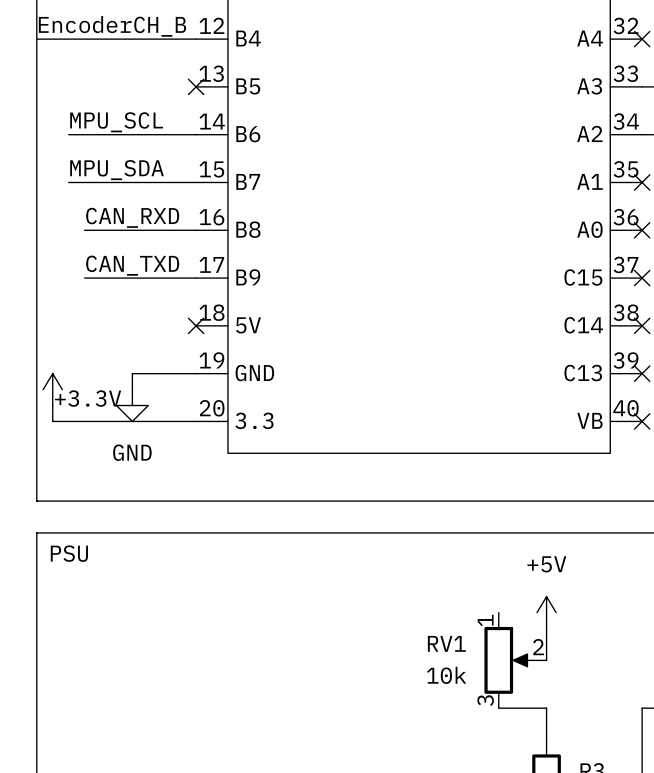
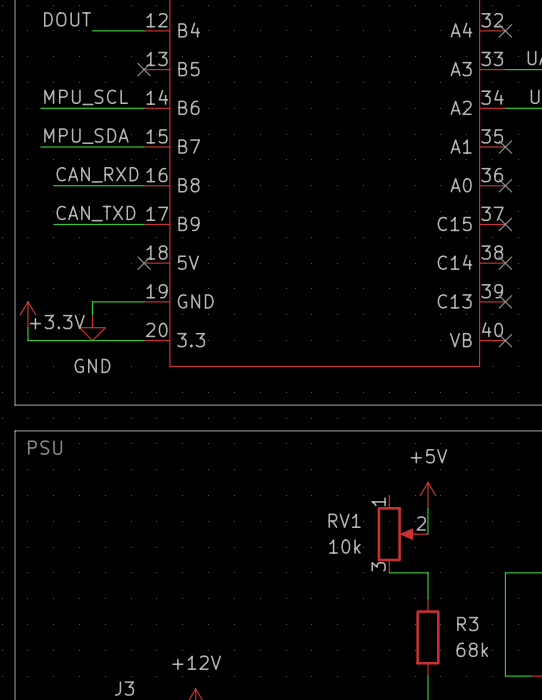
label: none -> DOUT (67, 19)
label: EncoderCH_B (112, 26) -> none
wire: (36, 39) (132, 39) -> none

